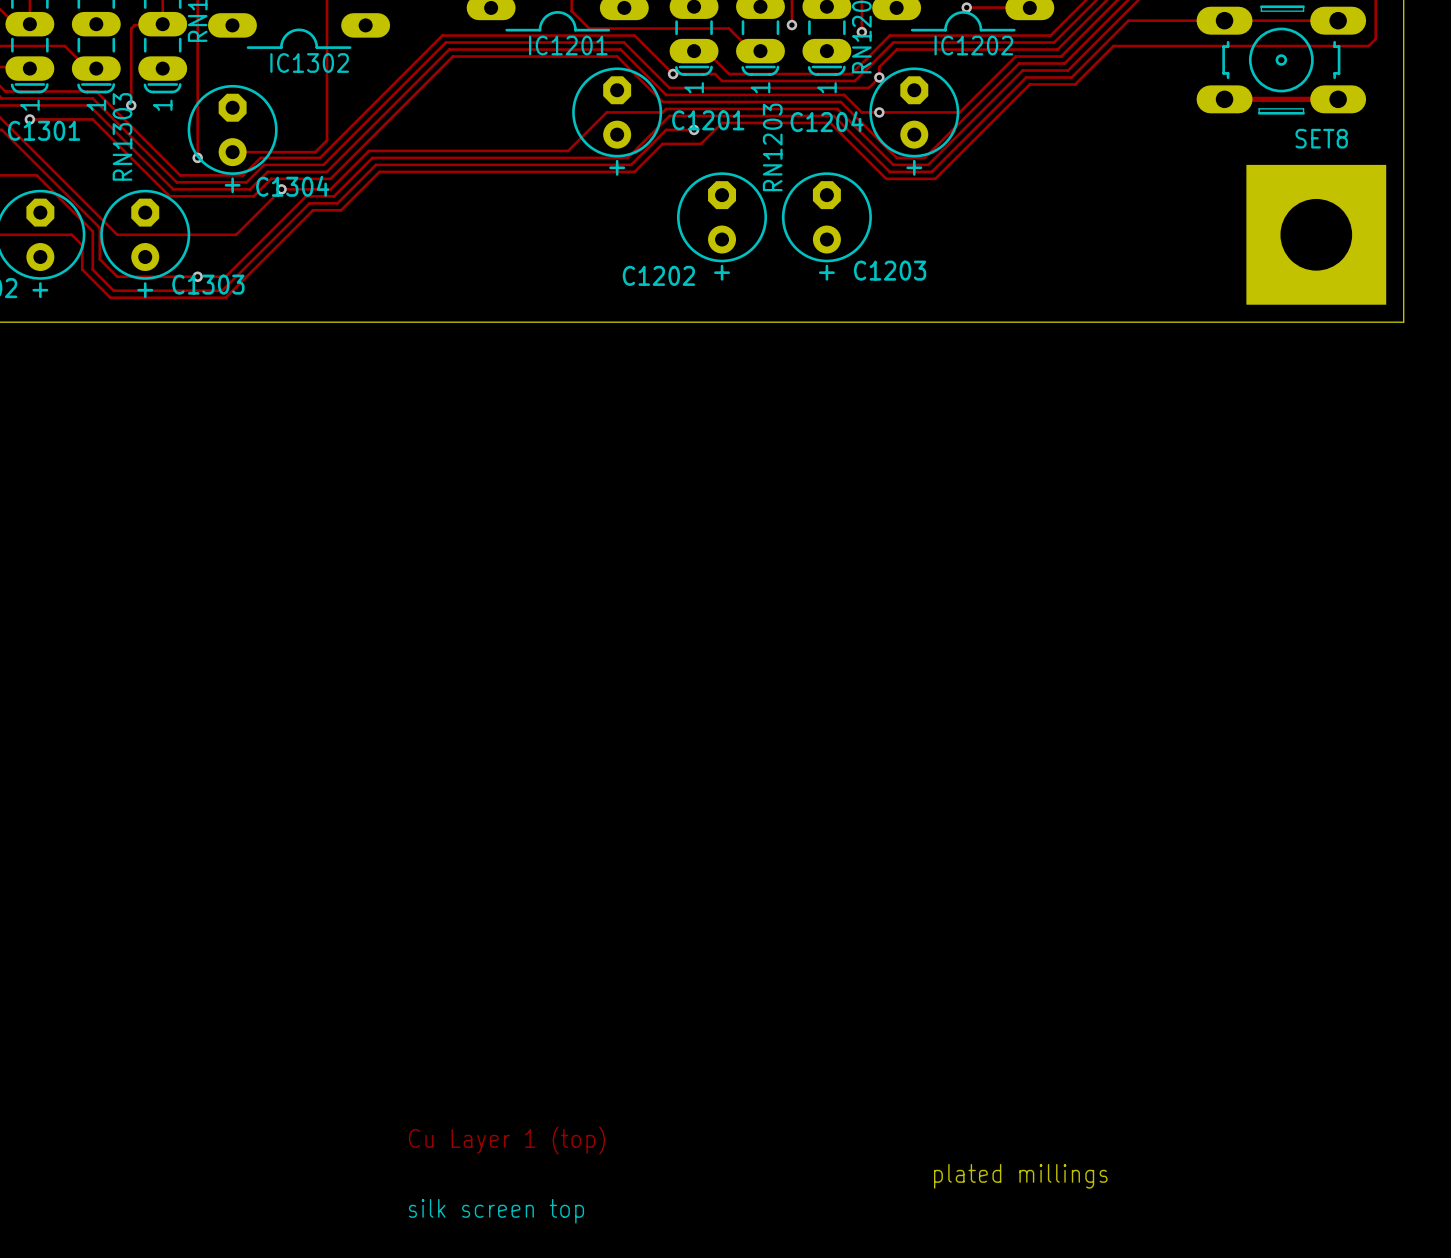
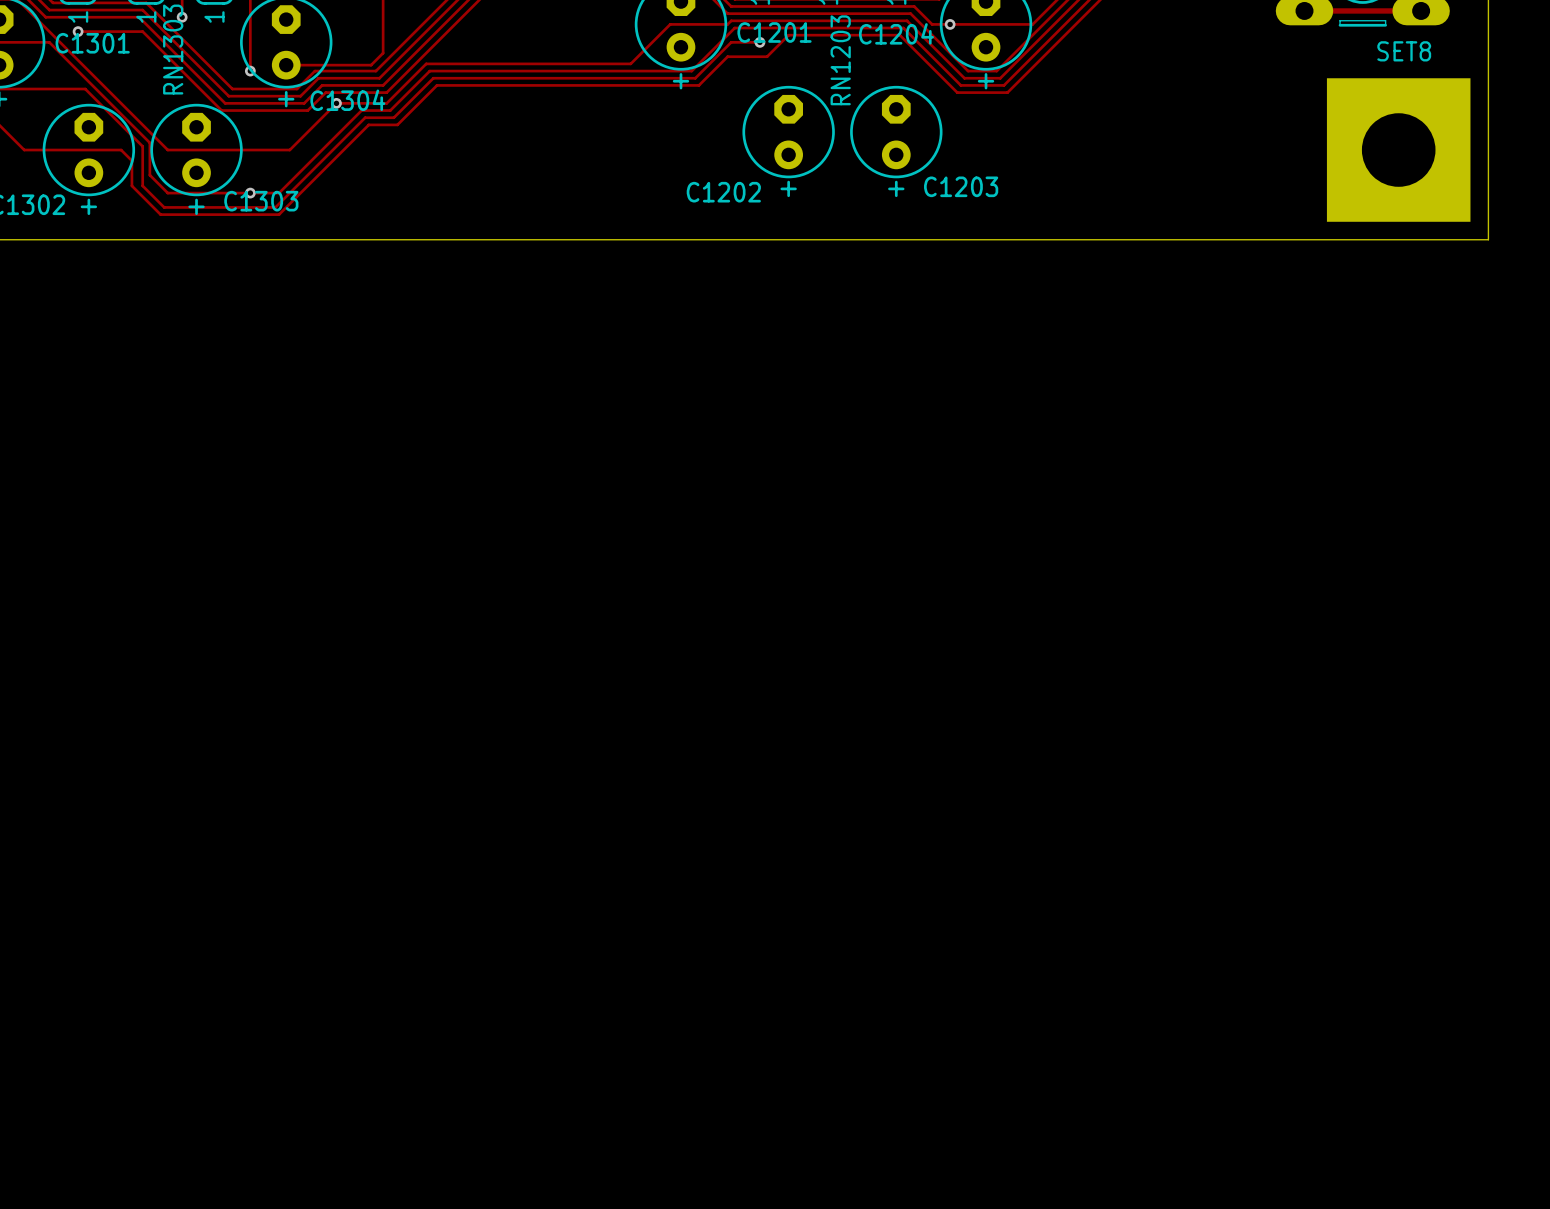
drawing: [408, 1126, 1108, 1224] -> none

